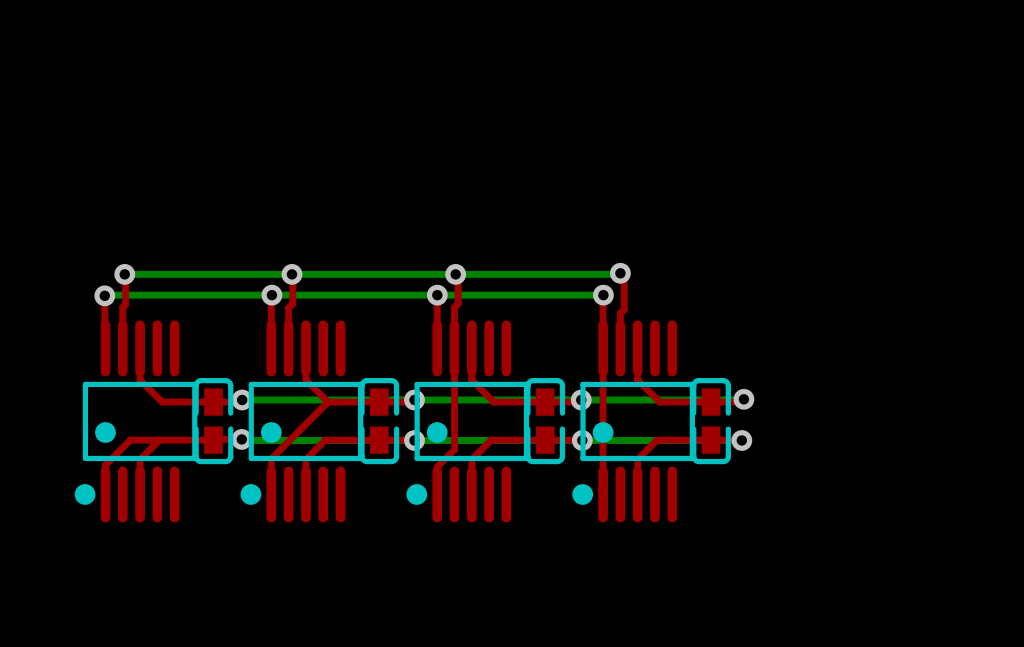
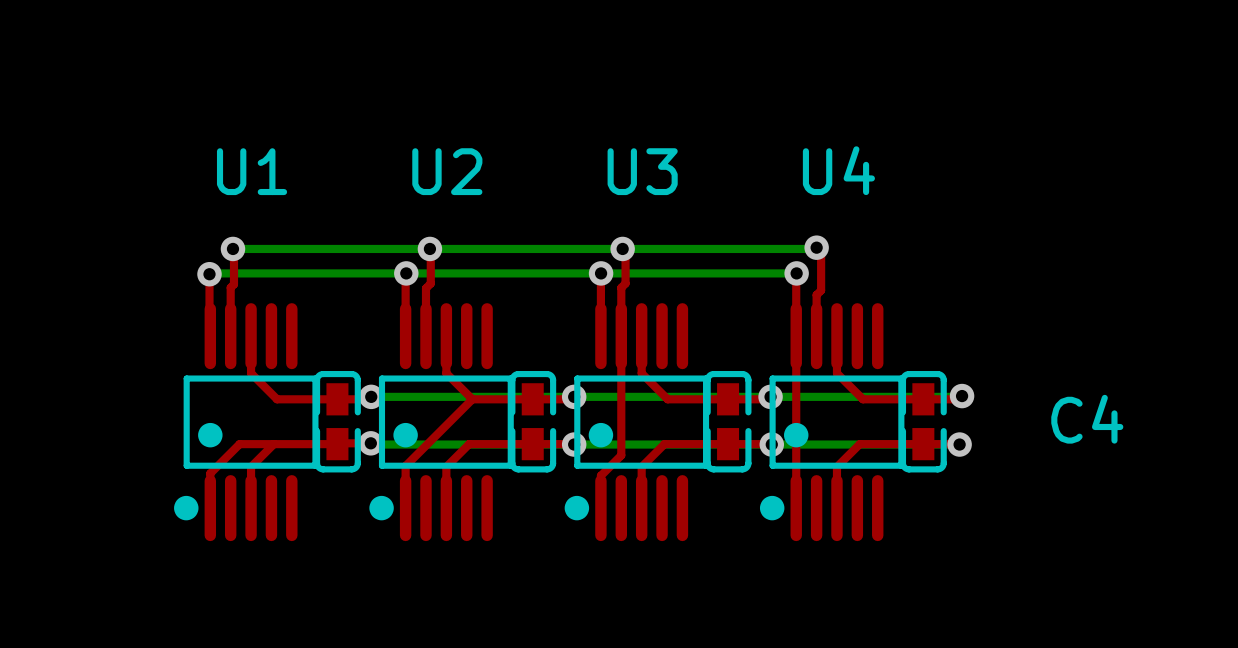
U4 name: none -> U4 (838, 170)
U1 name: none -> U1 (252, 171)
U2 name: none -> U2 (447, 171)
U3 name: none -> U3 (642, 171)
C4 name: none -> C4 (1087, 419)

